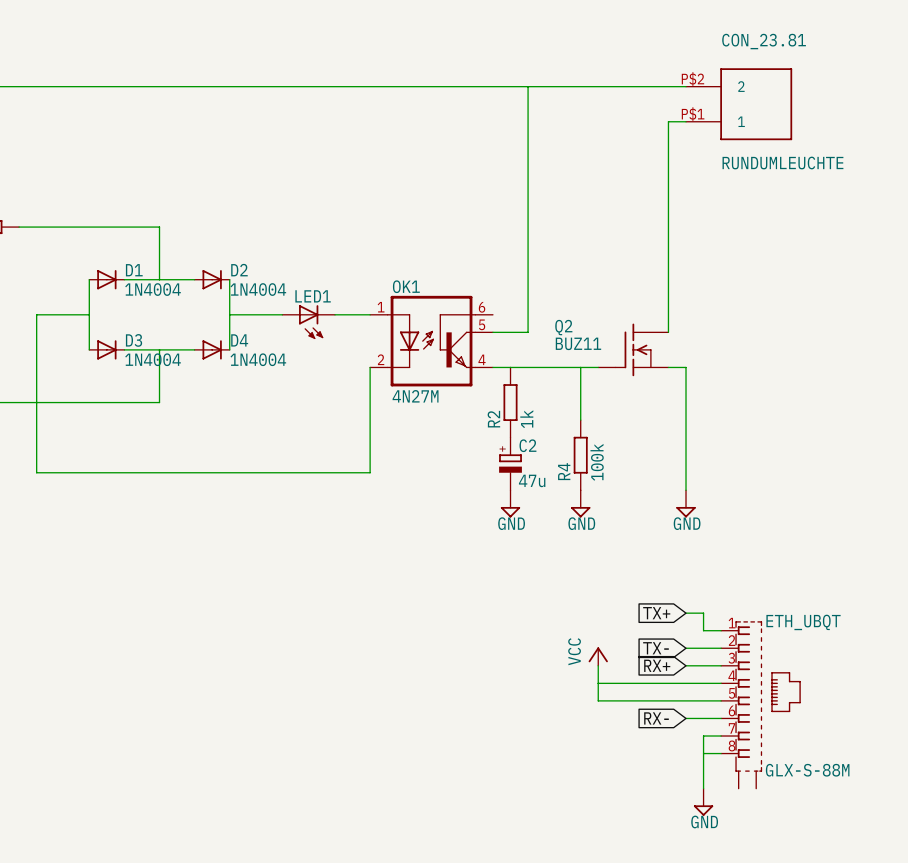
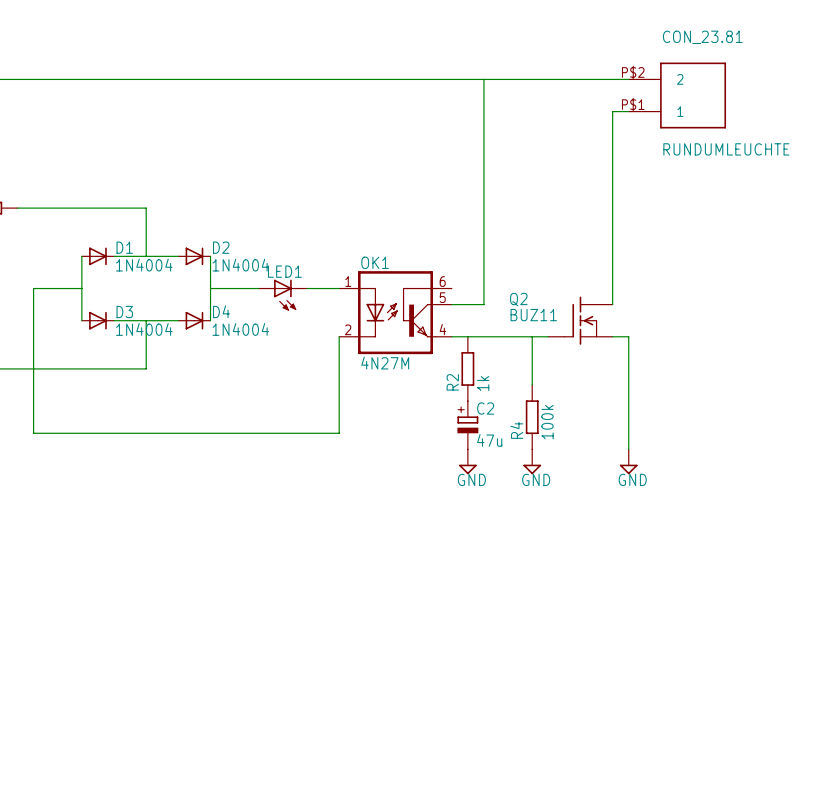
global label: TX+ (656, 613) -> none
wire: (686, 613) (703, 613) (703, 630) (721, 630) -> none
global label: TX- (655, 648) -> none
wire: (686, 648) (721, 648) -> none
power symbol: VCC (598, 656) -> none
wire: (598, 665) (598, 700) (721, 700) -> none
global label: RX+ (657, 665) -> none
wire: (686, 665) (721, 665) -> none
wire: (598, 683) (721, 683) -> none
ETH_UBQT: GLX-S-88M (760, 705) -> none
global label: RX- (656, 718) -> none
wire: (686, 718) (721, 718) -> none
wire: (721, 736) (703, 736) (703, 788) -> none
wire: (703, 753) (721, 753) -> none
power symbol: GND (703, 802) -> none

